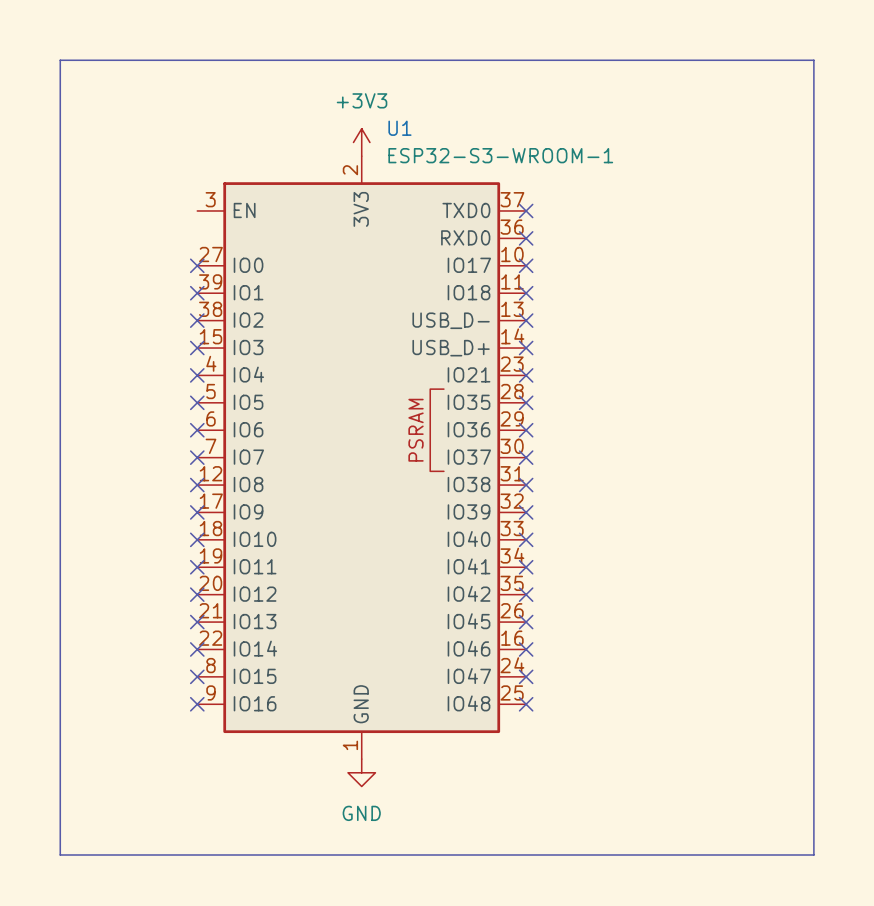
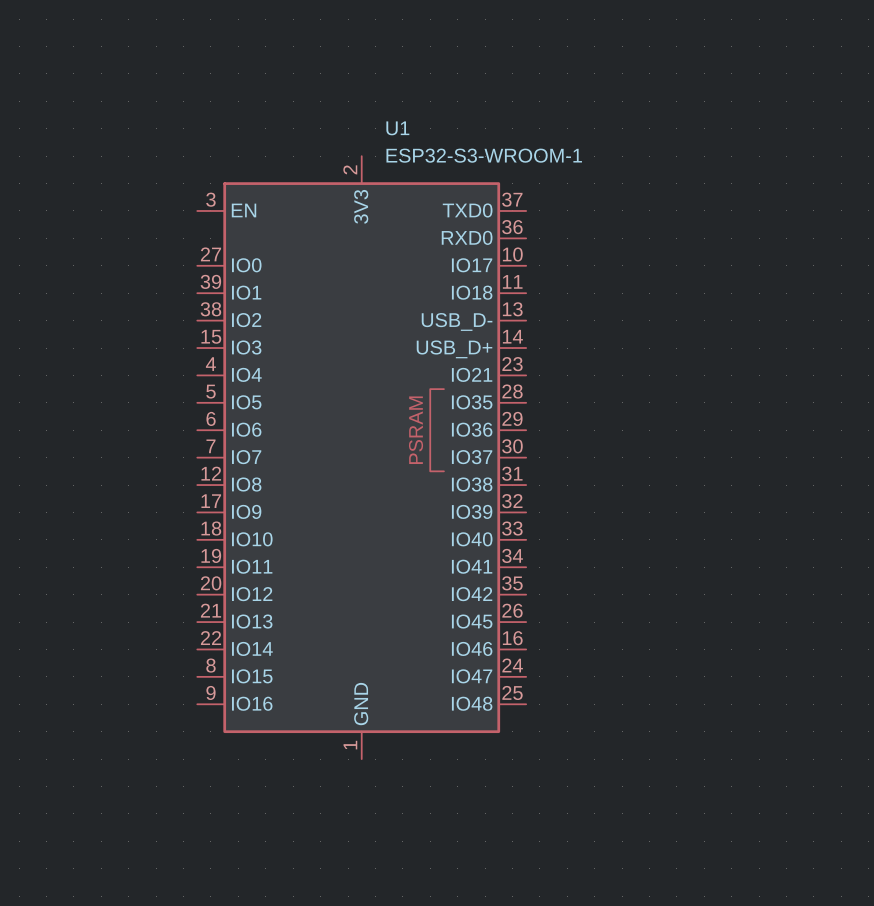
line: (60, 60) (813, 60) (813, 855) (60, 855) (60, 60) -> none
power symbol: +3V3 (361, 142) -> none
no-connect mark: (526, 210) -> none
no-connect mark: (526, 238) -> none
no-connect mark: (197, 265) -> none
no-connect mark: (526, 265) -> none
no-connect mark: (197, 293) -> none
no-connect mark: (526, 293) -> none
no-connect mark: (197, 320) -> none
no-connect mark: (526, 320) -> none
no-connect mark: (197, 348) -> none
no-connect mark: (526, 348) -> none
no-connect mark: (197, 375) -> none
no-connect mark: (526, 375) -> none
no-connect mark: (197, 402) -> none
no-connect mark: (526, 402) -> none
no-connect mark: (197, 430) -> none
no-connect mark: (526, 430) -> none
no-connect mark: (197, 457) -> none
no-connect mark: (526, 457) -> none
no-connect mark: (197, 485) -> none
no-connect mark: (526, 485) -> none
no-connect mark: (197, 512) -> none
no-connect mark: (526, 512) -> none
no-connect mark: (197, 539) -> none
no-connect mark: (526, 539) -> none
no-connect mark: (197, 567) -> none
no-connect mark: (526, 567) -> none
no-connect mark: (197, 594) -> none
no-connect mark: (526, 594) -> none
no-connect mark: (197, 622) -> none
no-connect mark: (526, 622) -> none
no-connect mark: (197, 649) -> none
no-connect mark: (526, 649) -> none
no-connect mark: (197, 676) -> none
no-connect mark: (526, 676) -> none
no-connect mark: (197, 704) -> none
no-connect mark: (526, 704) -> none
power symbol: GND (361, 772) -> none

